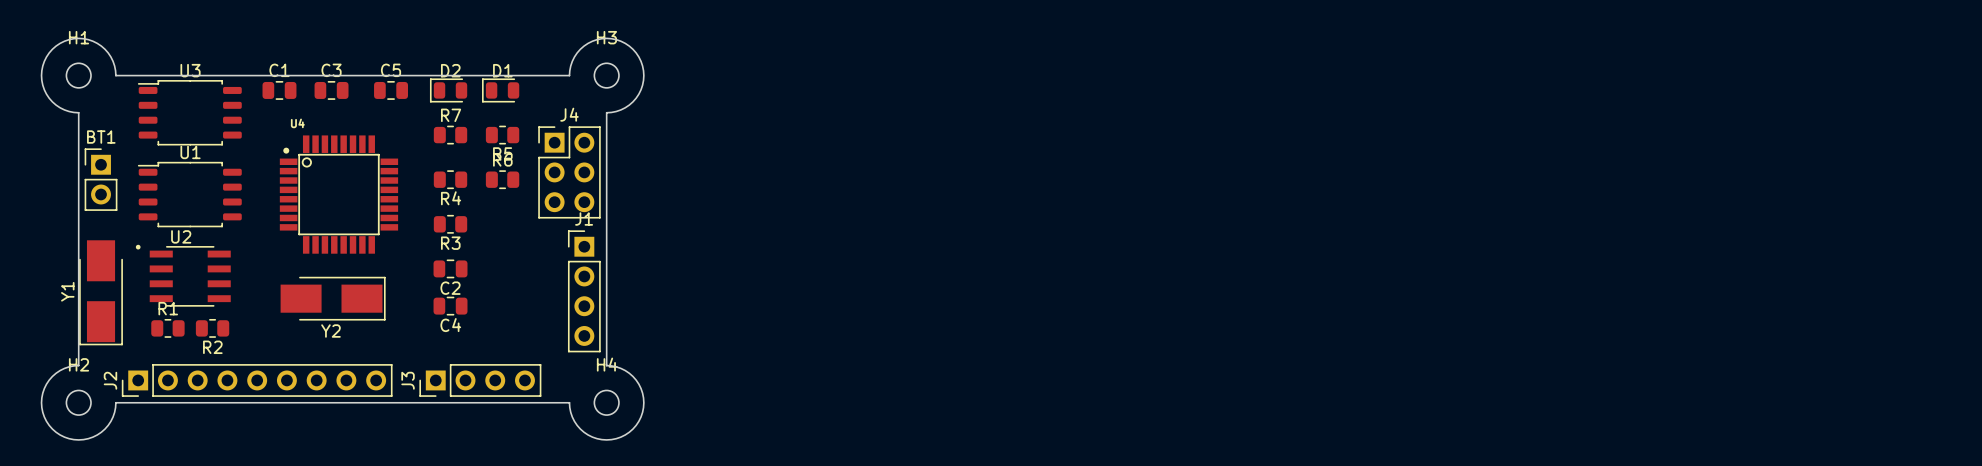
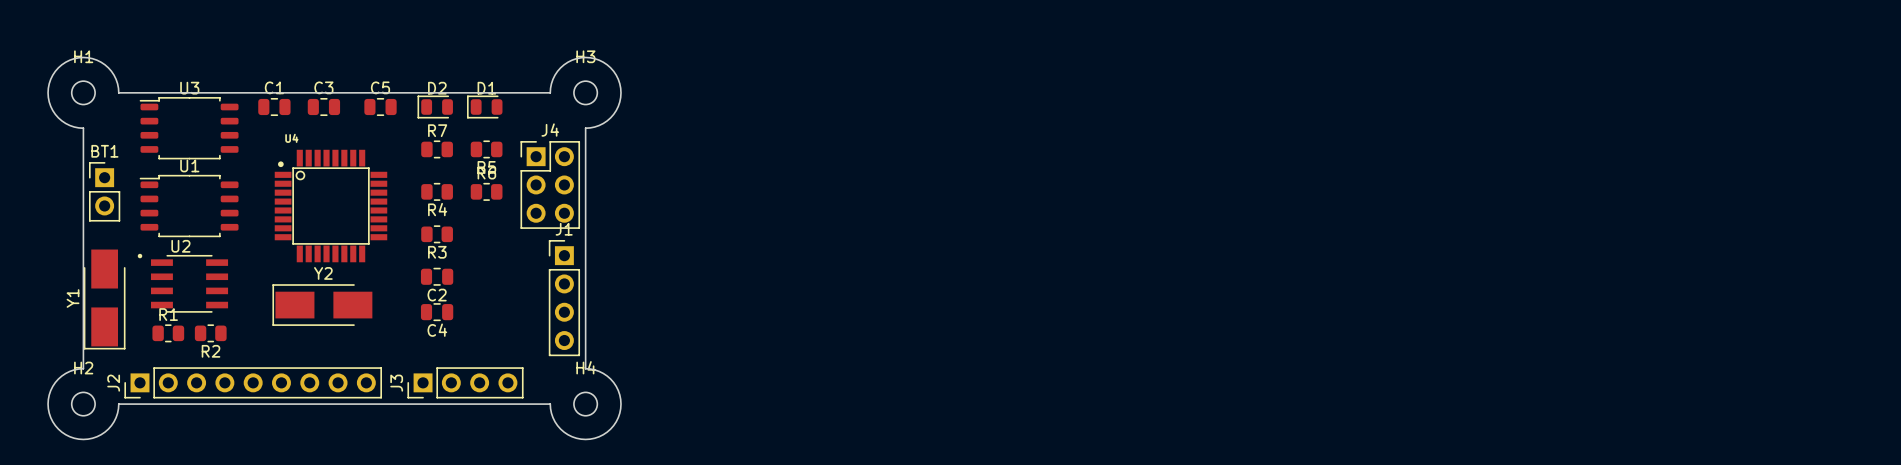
Y2 rotation: 0° (333, 298) -> 180° (322, 305)

